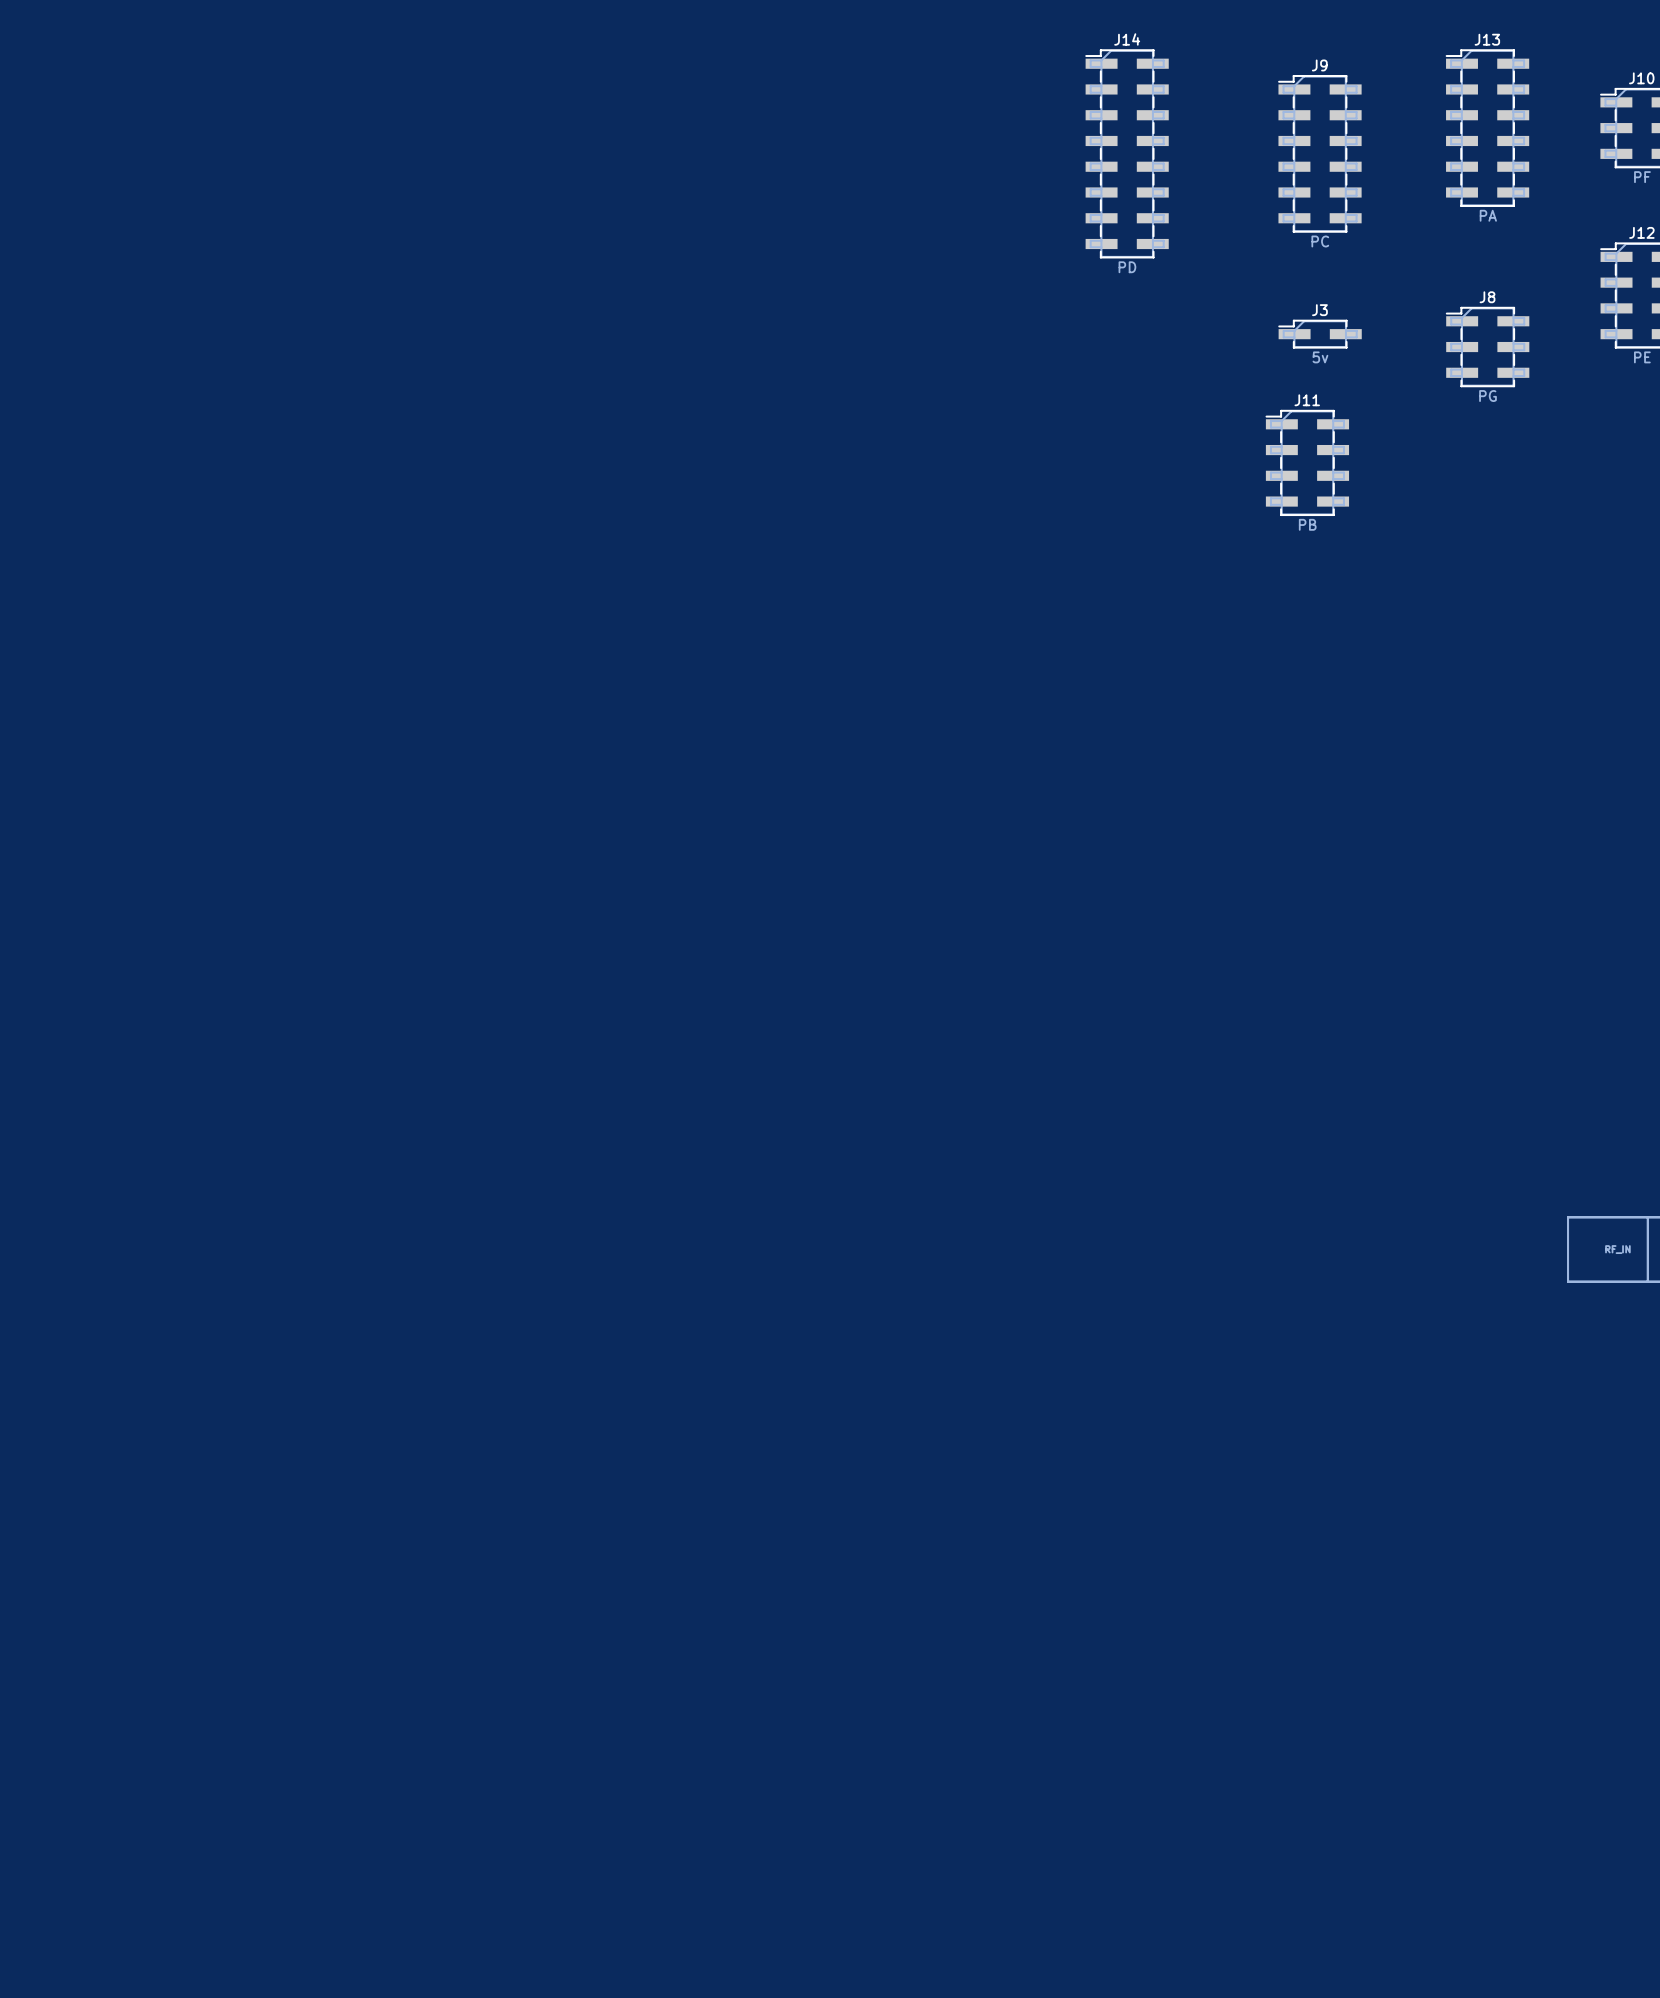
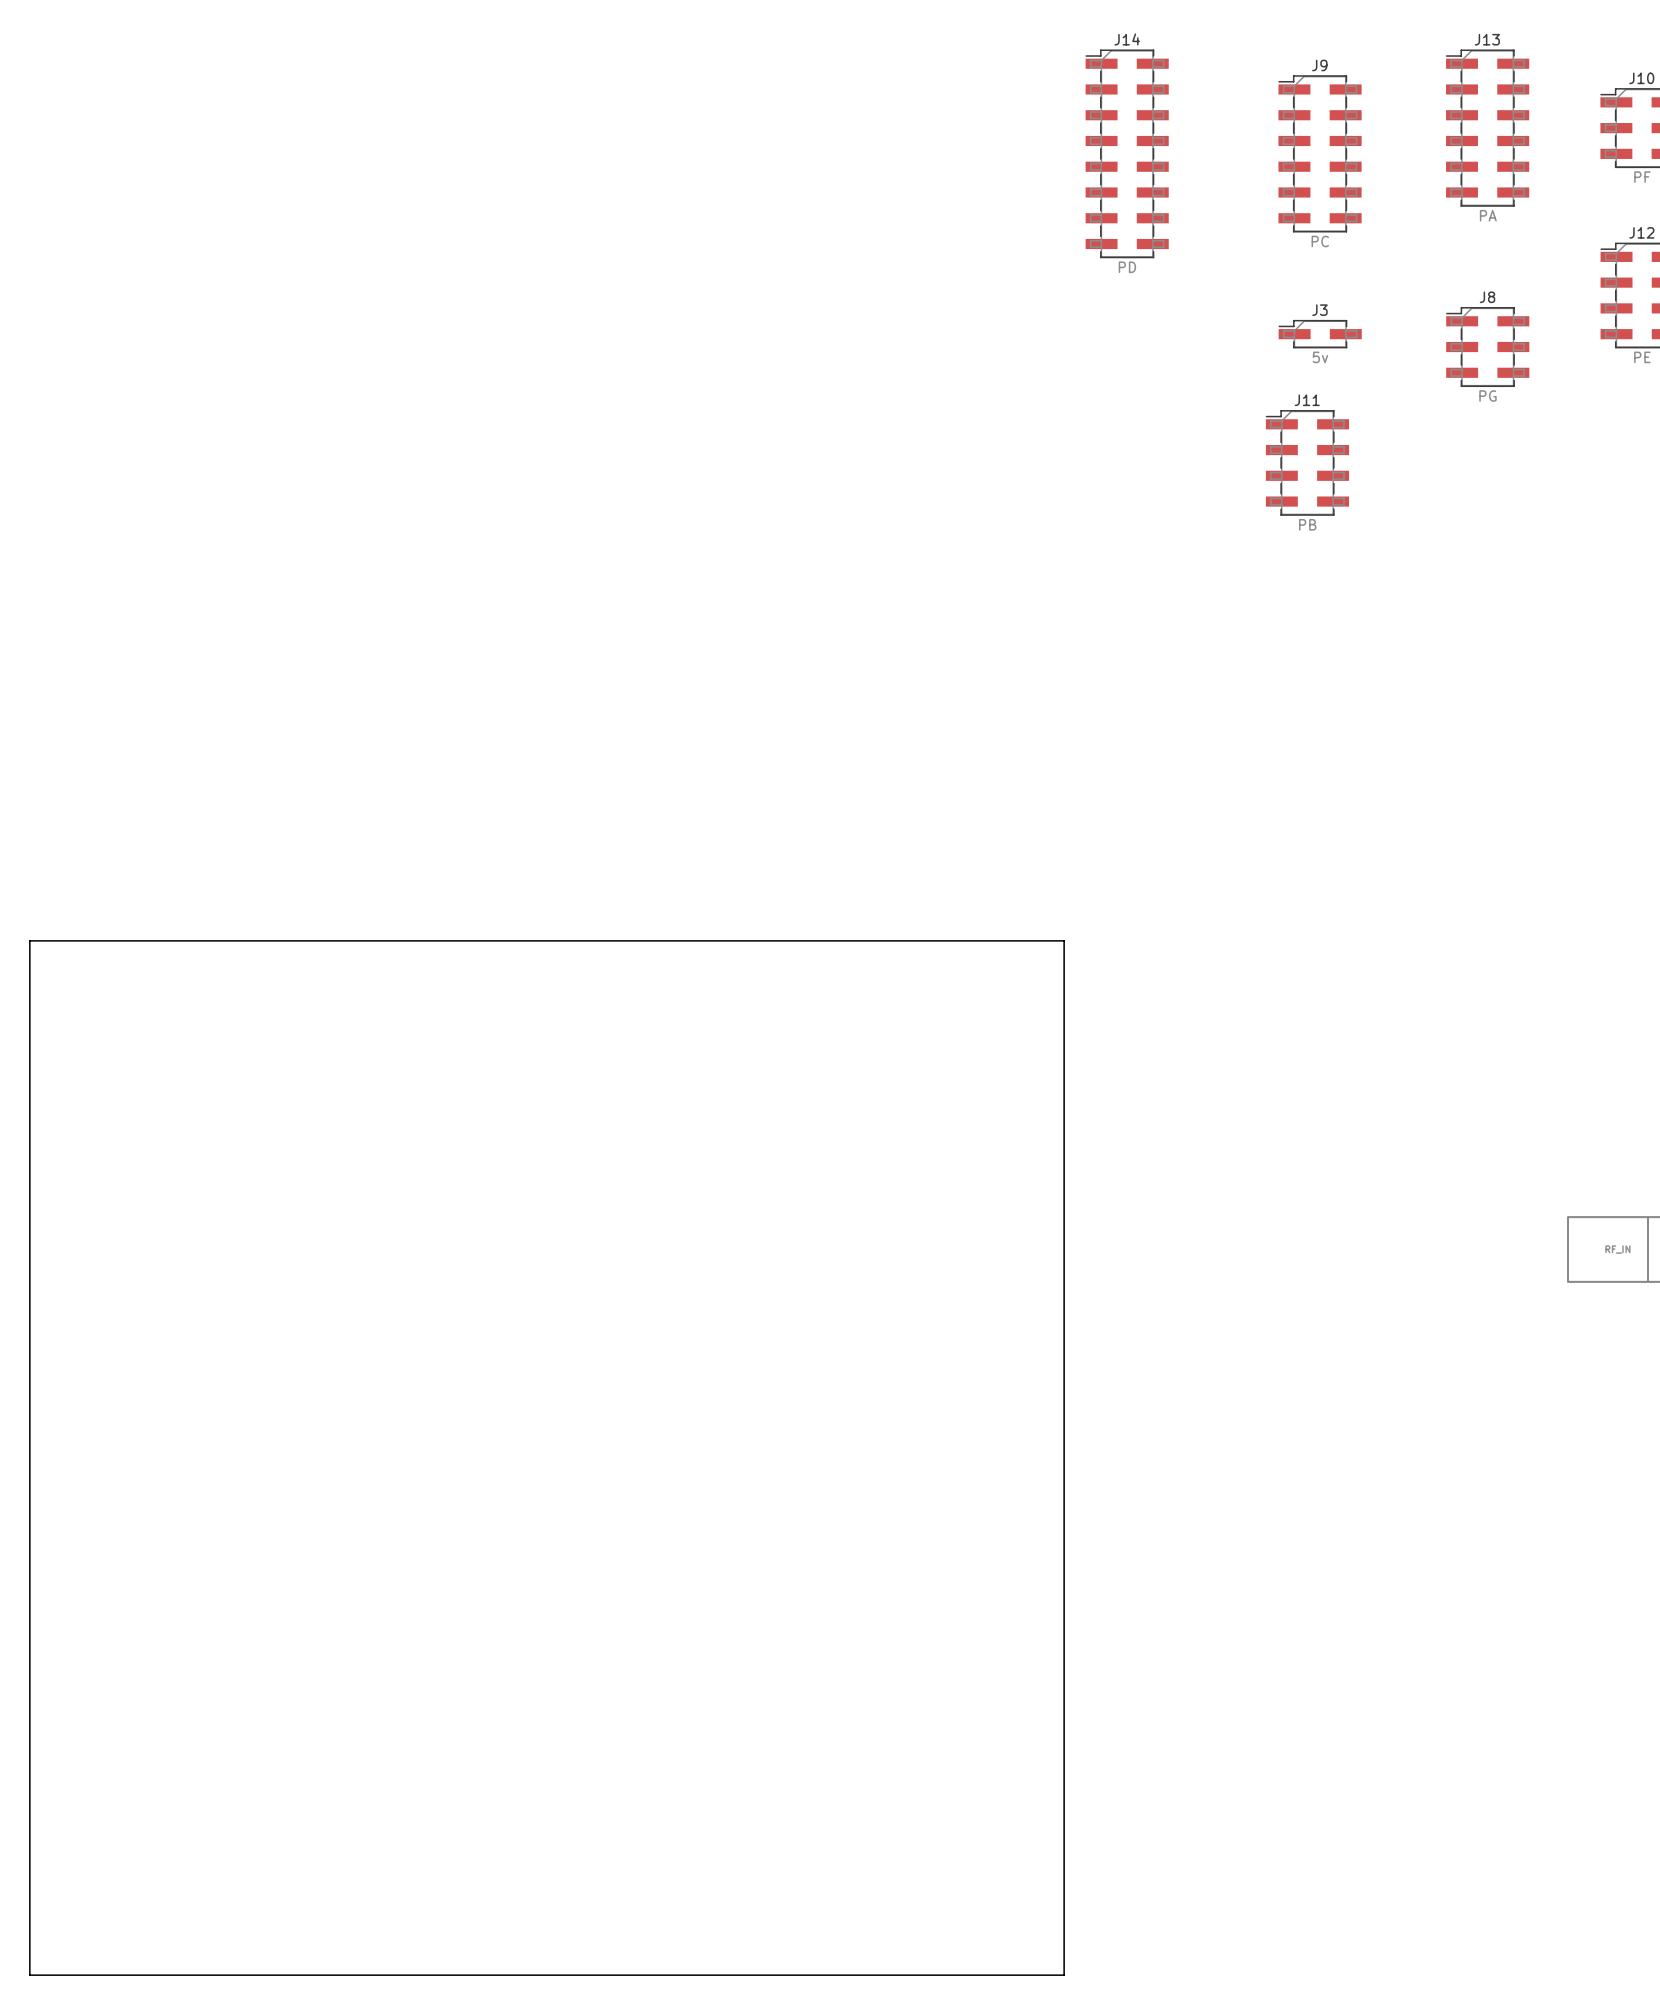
board edge: none -> (29, 940) (29, 1975) (1064, 1975) (1064, 940) (29, 940)

